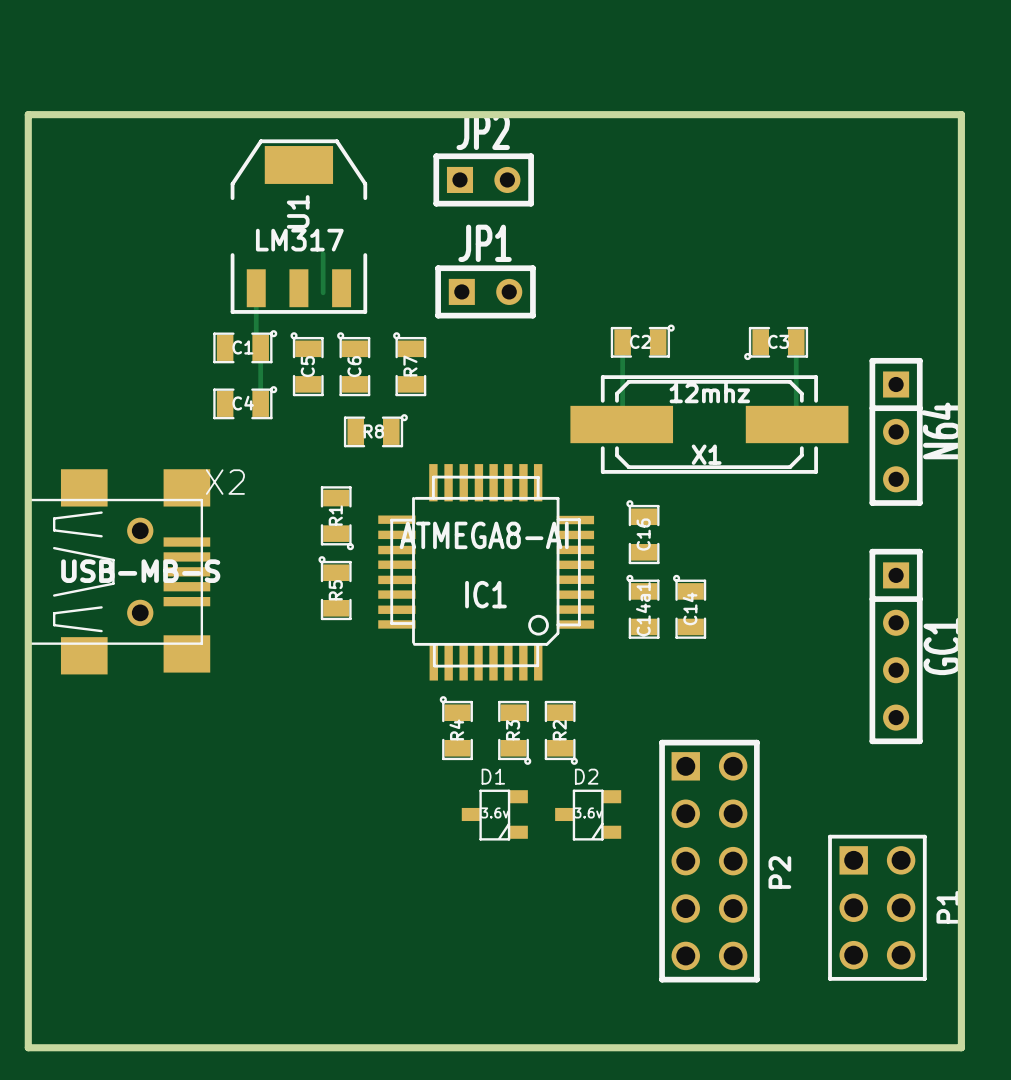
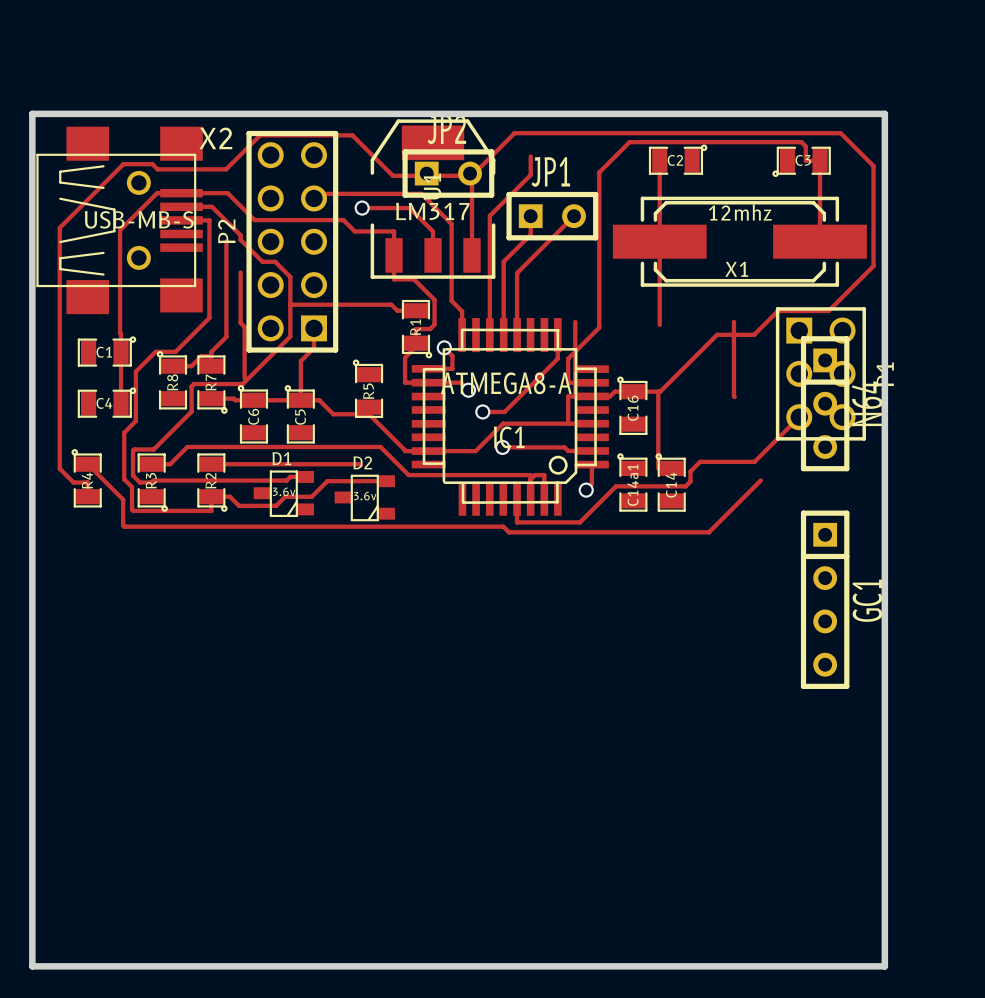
track: none -> (530, 156) (530, 175) (489, 215) (489, 335)
track: none -> (659, 160) (659, 324)
track: none -> (472, 175) (392, 175) (352, 135) (260, 135) (226, 169) (157, 169) (152, 164) (123, 164) (59, 227) (59, 468) (73, 482) (87, 482) (87, 496)
track: none -> (472, 175) (514, 133) (840, 133) (873, 166) (873, 266) (828, 310) (778, 310) (754, 334) (717, 334) (660, 391) (614, 391) (610, 396) (568, 396) (568, 423)
track: none -> (472, 175) (472, 255)
track: none -> (314, 198) (318, 193) (421, 193) (451, 224) (451, 300) (462, 311) (462, 335)
track: none -> (181, 206) (212, 206) (240, 235) (240, 239) (262, 261) (275, 261) (290, 276) (290, 336) (242, 384) (194, 384) (191, 386) (191, 411) (153, 449) (133, 450) (133, 475) (139, 482) (151, 482) (153, 480) (286, 480) (290, 476) (305, 476)
track: none -> (362, 208) (409, 208) (433, 231) (433, 255)
via: none -> (362, 208)
U1 position: (298, 226) -> (433, 199)
track: none -> (530, 216) (530, 234) (503, 261) (503, 335)
track: none -> (574, 216) (517, 273) (517, 335)
track: none -> (181, 220) (209, 220) (209, 317) (175, 351) (155, 351) (135, 371) (135, 421) (124, 432) (124, 479) (132, 487) (132, 509) (211, 510) (211, 496) (229, 496) (239, 505) (276, 505) (285, 496) (311, 496) (327, 481) (386, 481)
track: (323, 253) (323, 292) -> none
track: none -> (226, 241) (226, 336) (211, 351) (211, 366)
track: none -> (820, 241) (820, 160) (805, 160) (805, 146) (801, 142) (629, 142) (599, 172) (599, 327) (568, 358) (568, 382) (591, 382)
JP1 position: (485, 291) -> (552, 216)
track: none -> (290, 304) (391, 304) (397, 310) (415, 310)
C2 position: (642, 341) -> (678, 159)
C3 position: (776, 343) -> (801, 161)
C1 position: (245, 346) -> (106, 351)
track: none -> (314, 328) (314, 347) (300, 361) (300, 400)
track: none -> (557, 335) (557, 358) (504, 411) (482, 411)
C5 position: (307, 364) -> (299, 414)
C6 position: (353, 364) -> (252, 414)
R7 rotation: 0° (409, 364) -> 180° (212, 384)
R7 position: (409, 364) -> (212, 384)
track: none -> (444, 347) (452, 355) (452, 368) (428, 368)
via: none -> (444, 347)
track: none -> (211, 356) (201, 356) (191, 366) (173, 366)
C4 position: (245, 402) -> (106, 402)
track: none -> (468, 390) (461, 382) (405, 382) (405, 357) (415, 346) (415, 329) (430, 329) (434, 324) (434, 299) (414, 279) (394, 279) (394, 231) (354, 231) (343, 220) (254, 220) (227, 193) (157, 193) (120, 230) (121, 403)
via: none -> (468, 390)
track: none -> (658, 391) (658, 468)
X1 position: (709, 424) -> (739, 241)
track: none -> (211, 398) (319, 400) (333, 414) (369, 414)
R8 rotation: 0° (375, 430) -> 90° counterclockwise (171, 380)
R8 position: (375, 430) -> (171, 380)
via: none -> (482, 411)
track: none -> (369, 414) (405, 451) (475, 451) (503, 423) (591, 423)
track: none -> (799, 417) (754, 461) (700, 461) (690, 471) (690, 481) (685, 486) (616, 486) (579, 522) (517, 522) (517, 498)
track: none -> (502, 447) (564, 447) (568, 450) (591, 450)
via: none -> (502, 447)
track: none -> (87, 464) (123, 499) (124, 526) (503, 526) (509, 532) (708, 532) (760, 480)
track: none -> (151, 464) (170, 464) (187, 446) (380, 446) (408, 475) (530, 475) (530, 498)
track: none -> (211, 464) (360, 465)
track: none -> (591, 464) (591, 484) (586, 490)
track: none -> (530, 479) (535, 475) (544, 475) (544, 498)
R1 position: (337, 518) -> (417, 329)
via: none -> (586, 490)
C16 position: (642, 532) -> (632, 405)
X2 position: (119, 571) -> (119, 220)
IC1 position: (486, 572) -> (510, 416)
R5 position: (335, 588) -> (367, 388)
C14a1 position: (642, 606) -> (632, 482)
C14 position: (689, 606) -> (670, 482)
R4 position: (456, 728) -> (86, 478)
R3 position: (514, 732) -> (152, 482)
R2 position: (561, 732) -> (212, 482)
D1 position: (494, 815) -> (283, 493)
D2 position: (588, 815) -> (364, 497)
P2 rotation: 0° (709, 861) -> 180° (292, 241)
P2 position: (709, 861) -> (292, 241)
P1 position: (877, 907) -> (820, 373)

